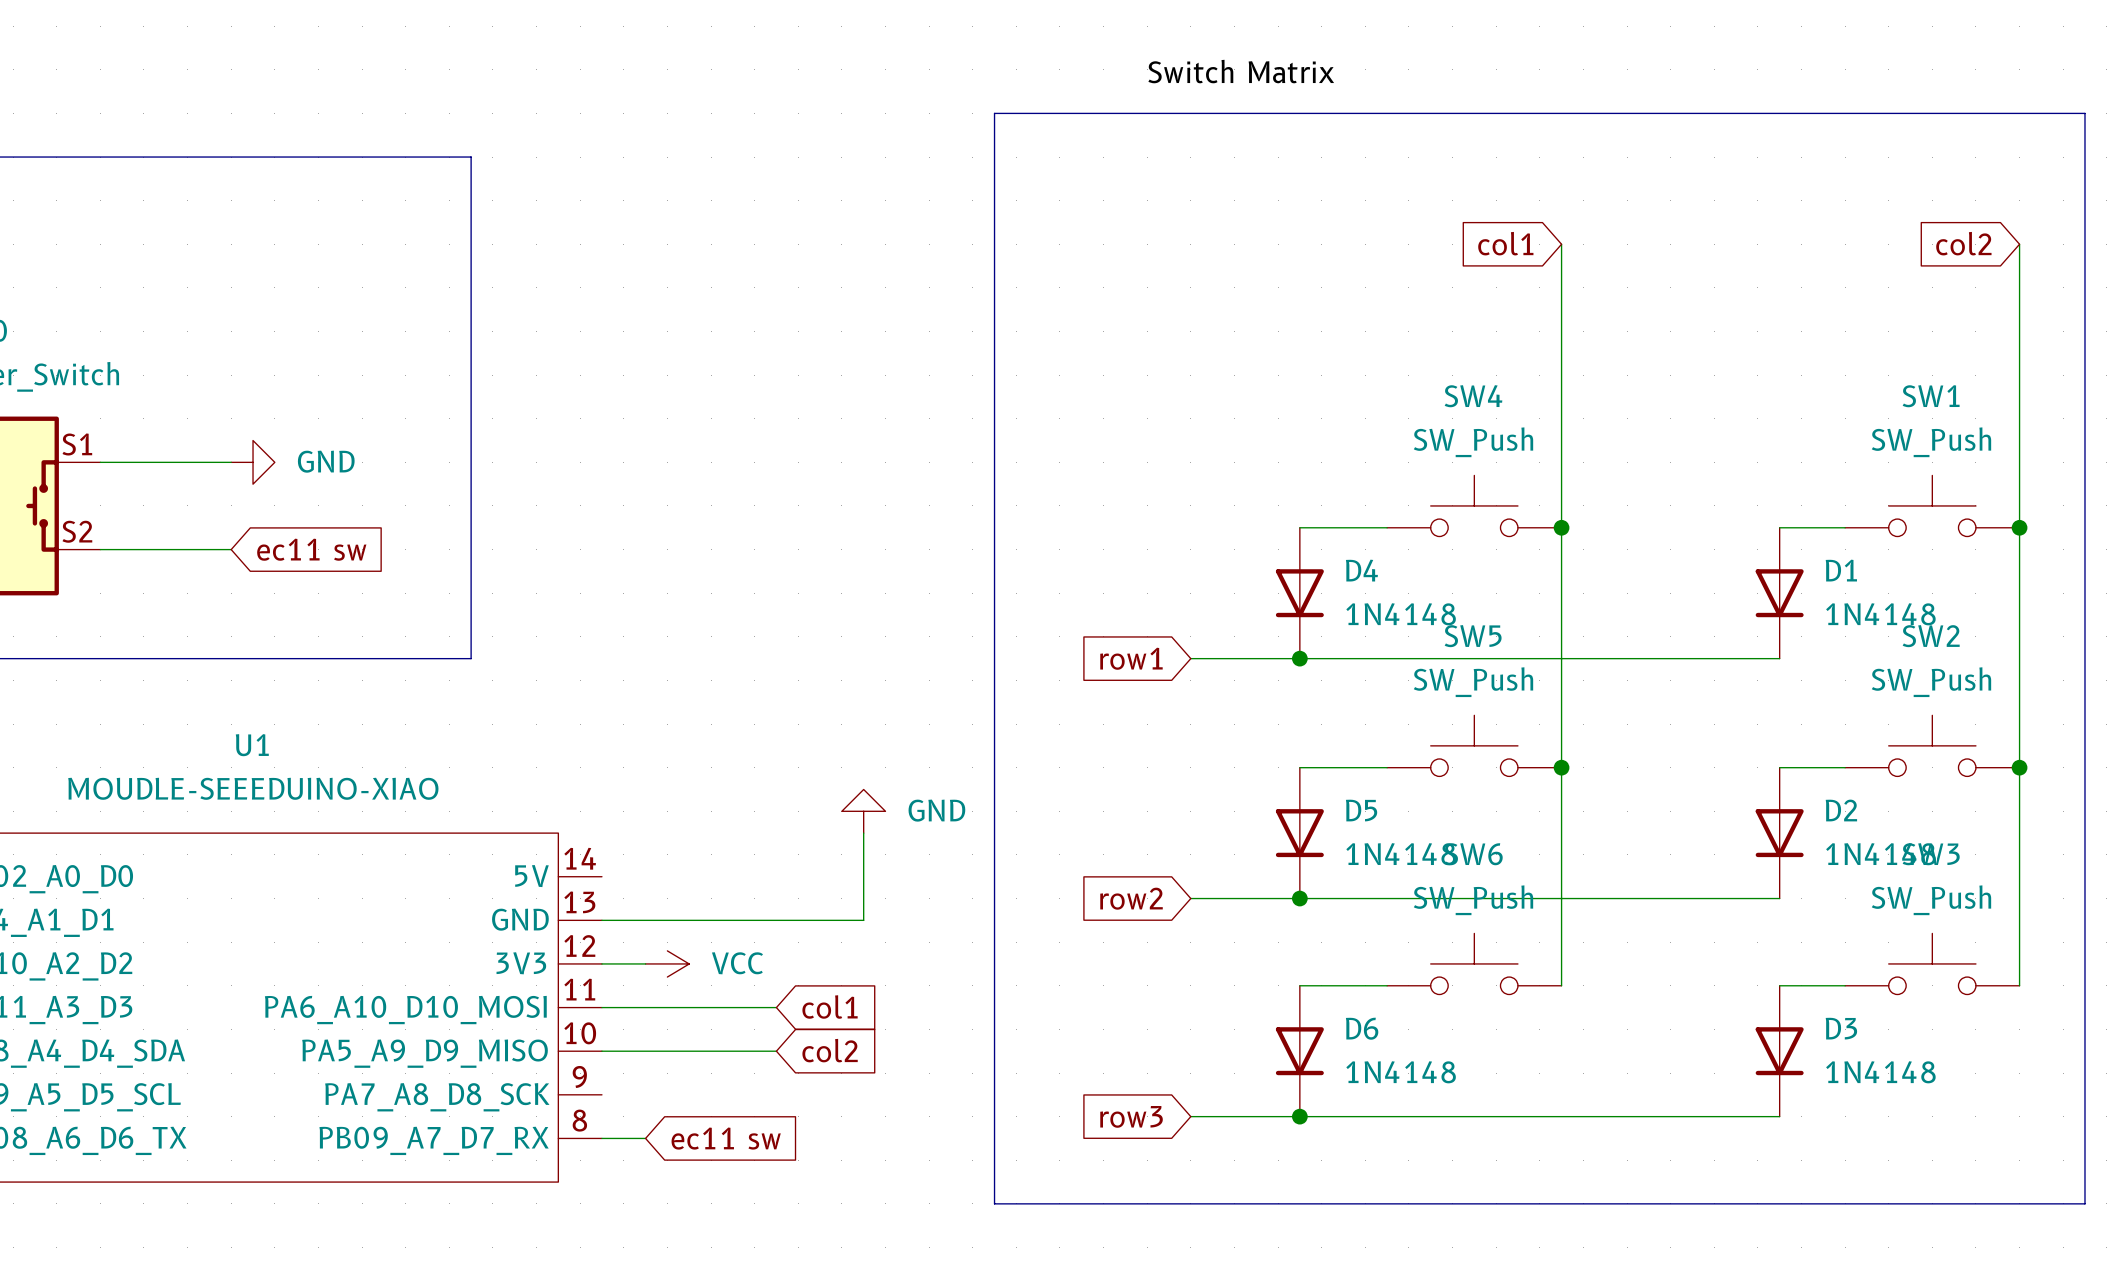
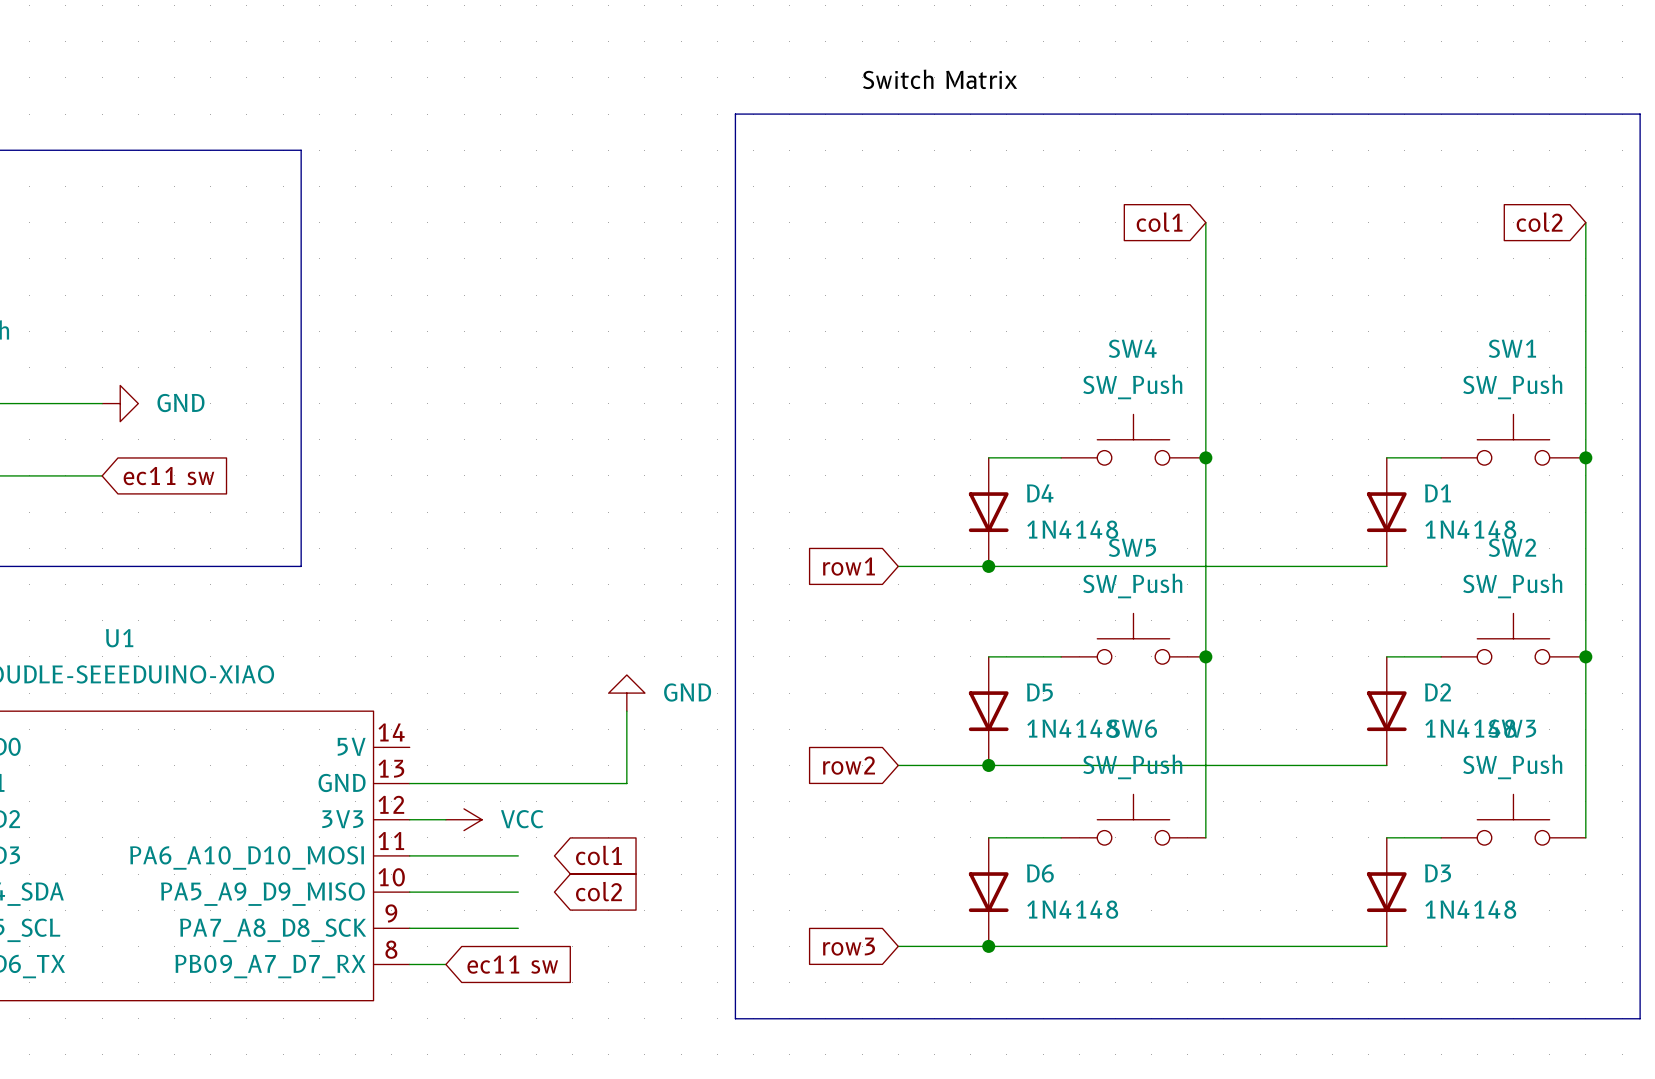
wire: (732, 1007) (776, 1007) -> none
wire: (732, 1051) (776, 1051) -> none
wire: none -> (409, 928) (518, 928)

